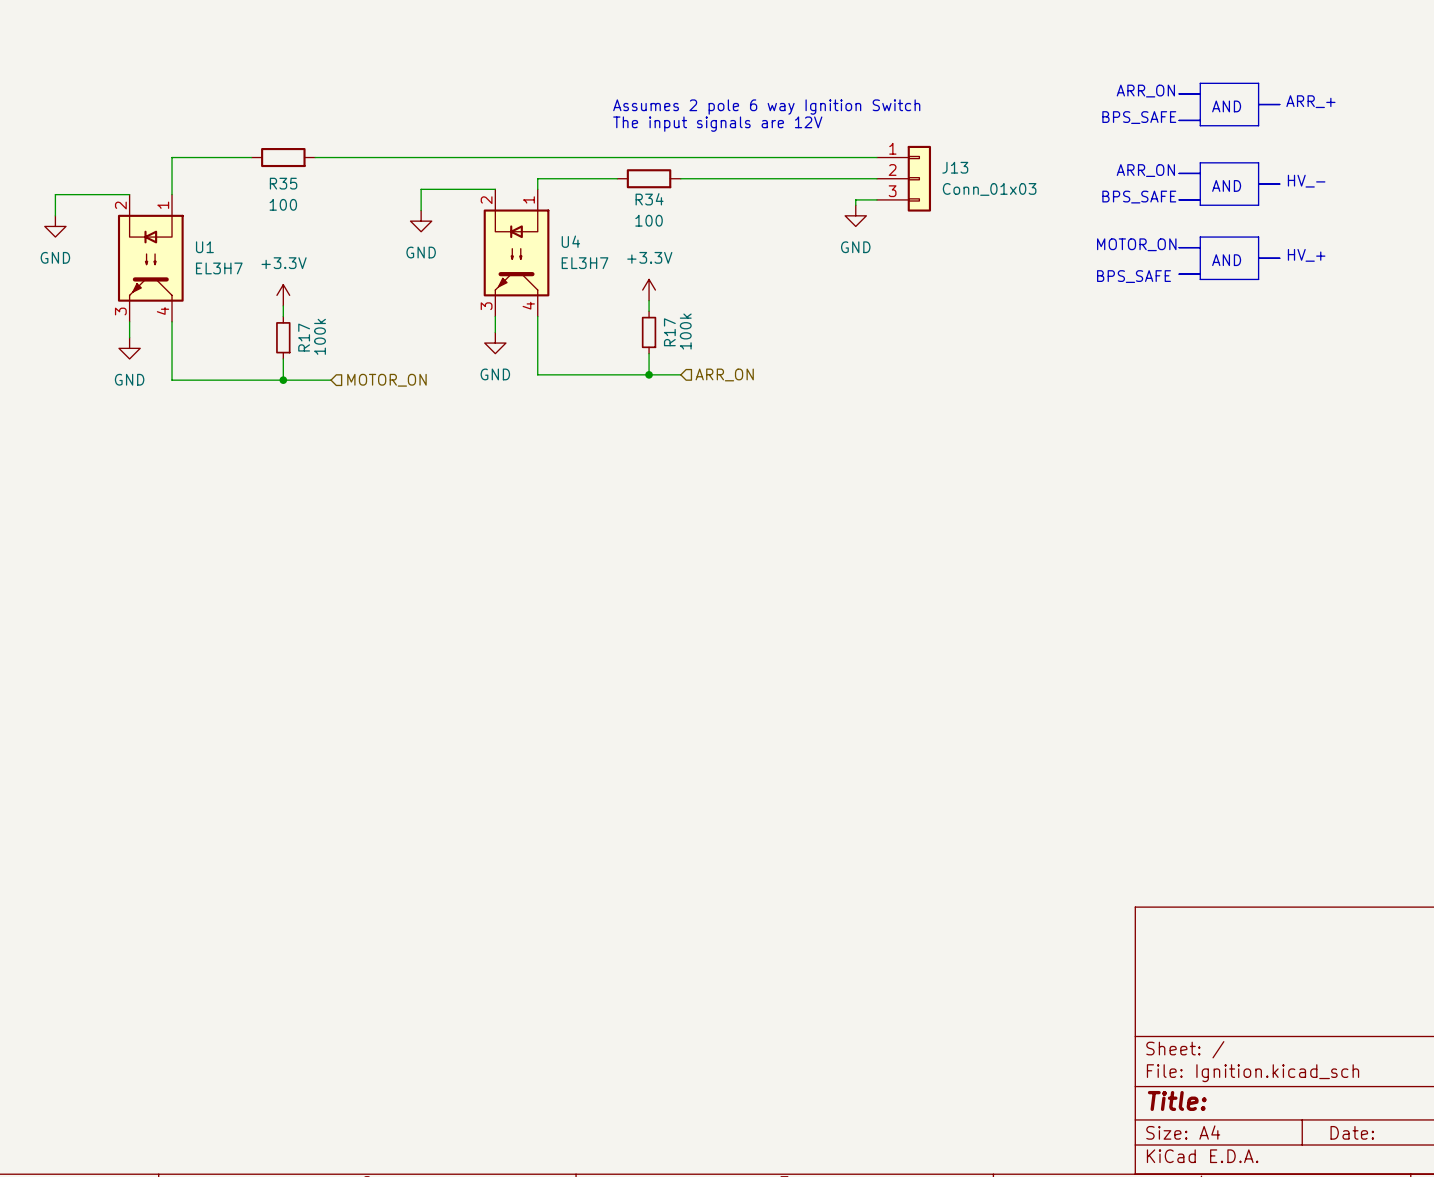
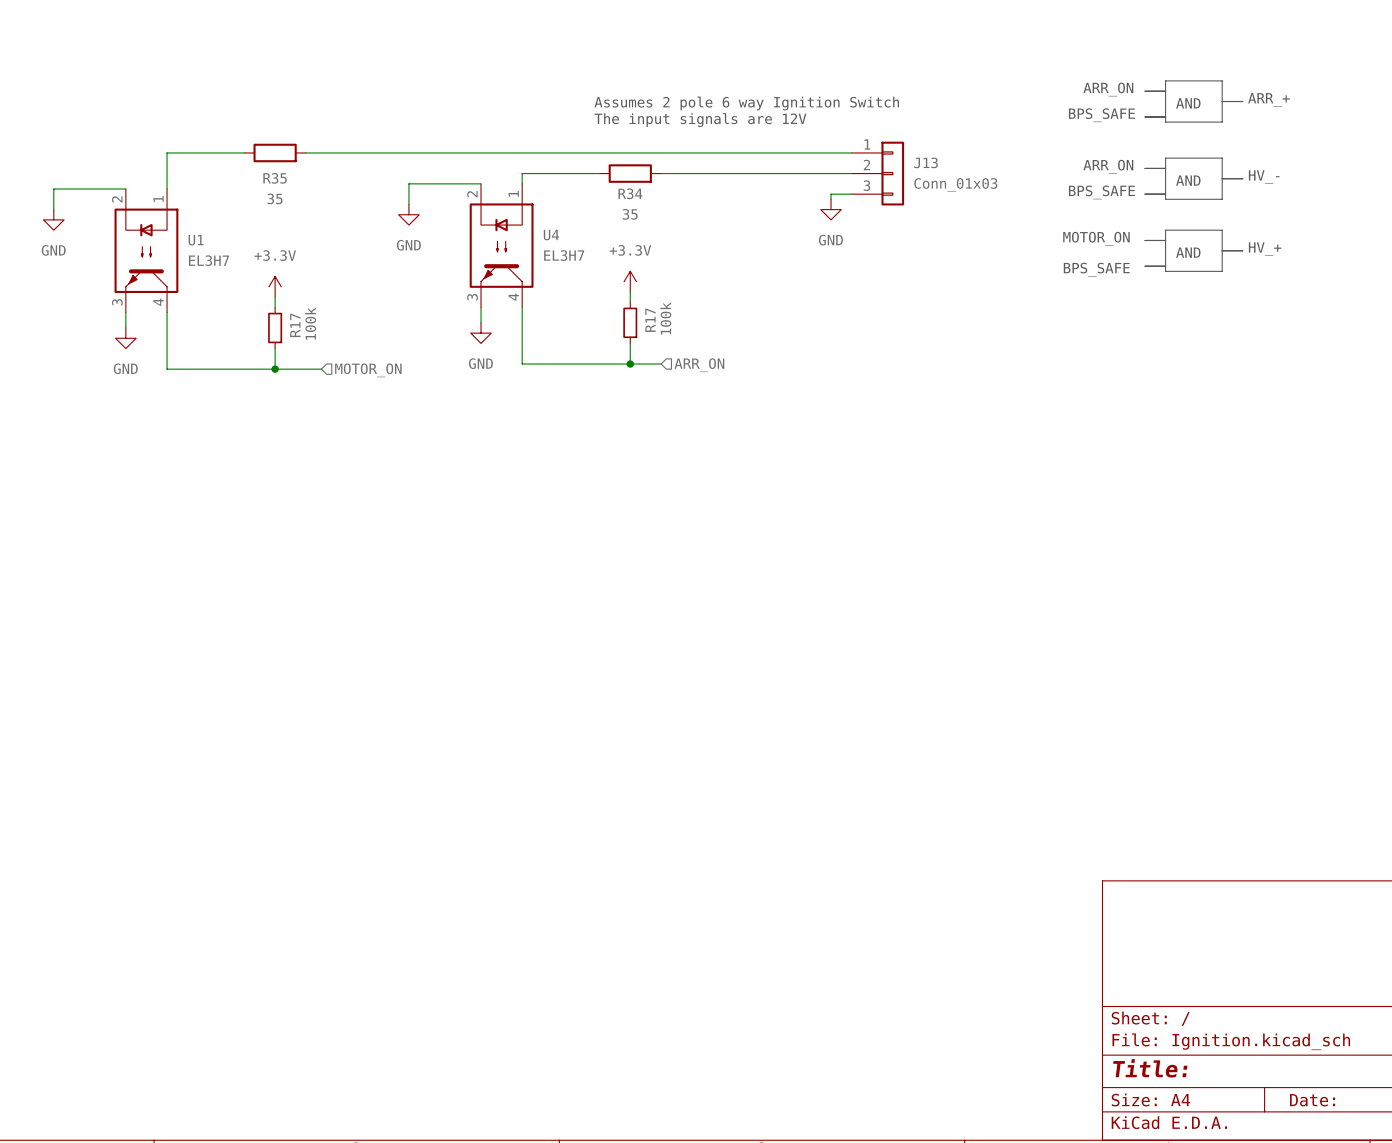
R35 value: 100 (283, 204) -> 35 (275, 198)
R34 value: 100 (649, 220) -> 35 (630, 214)

